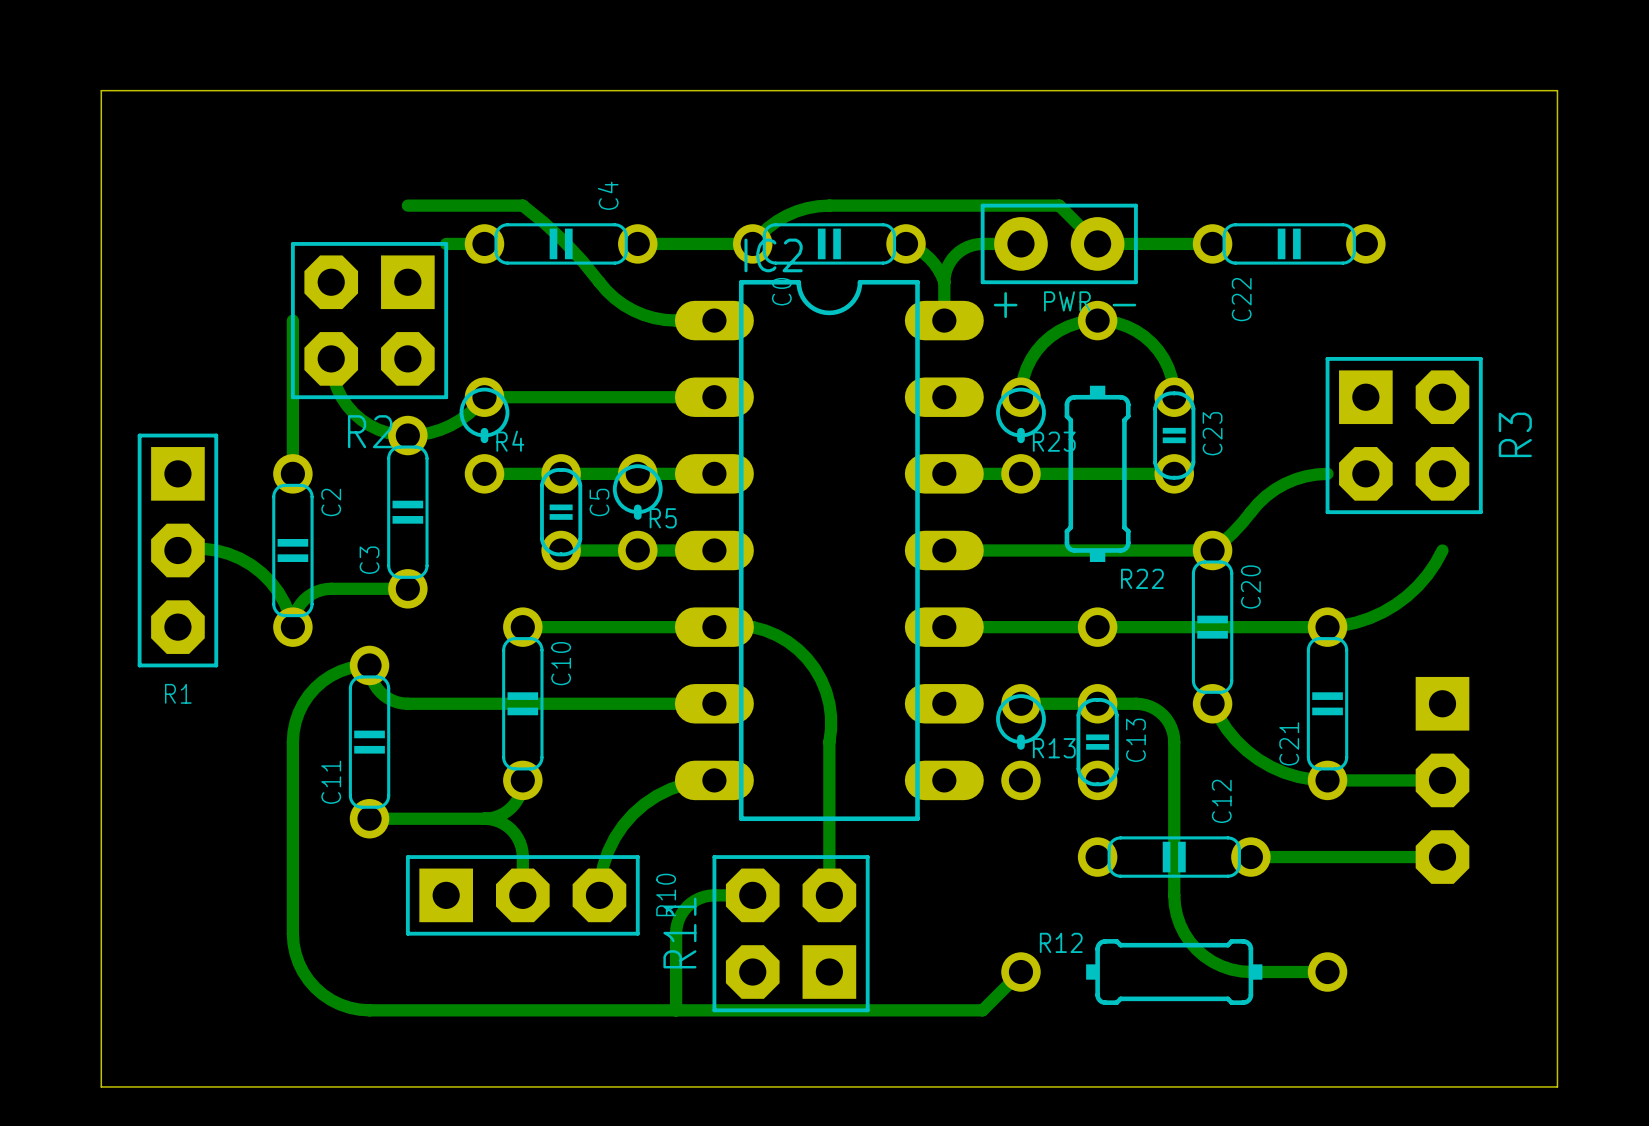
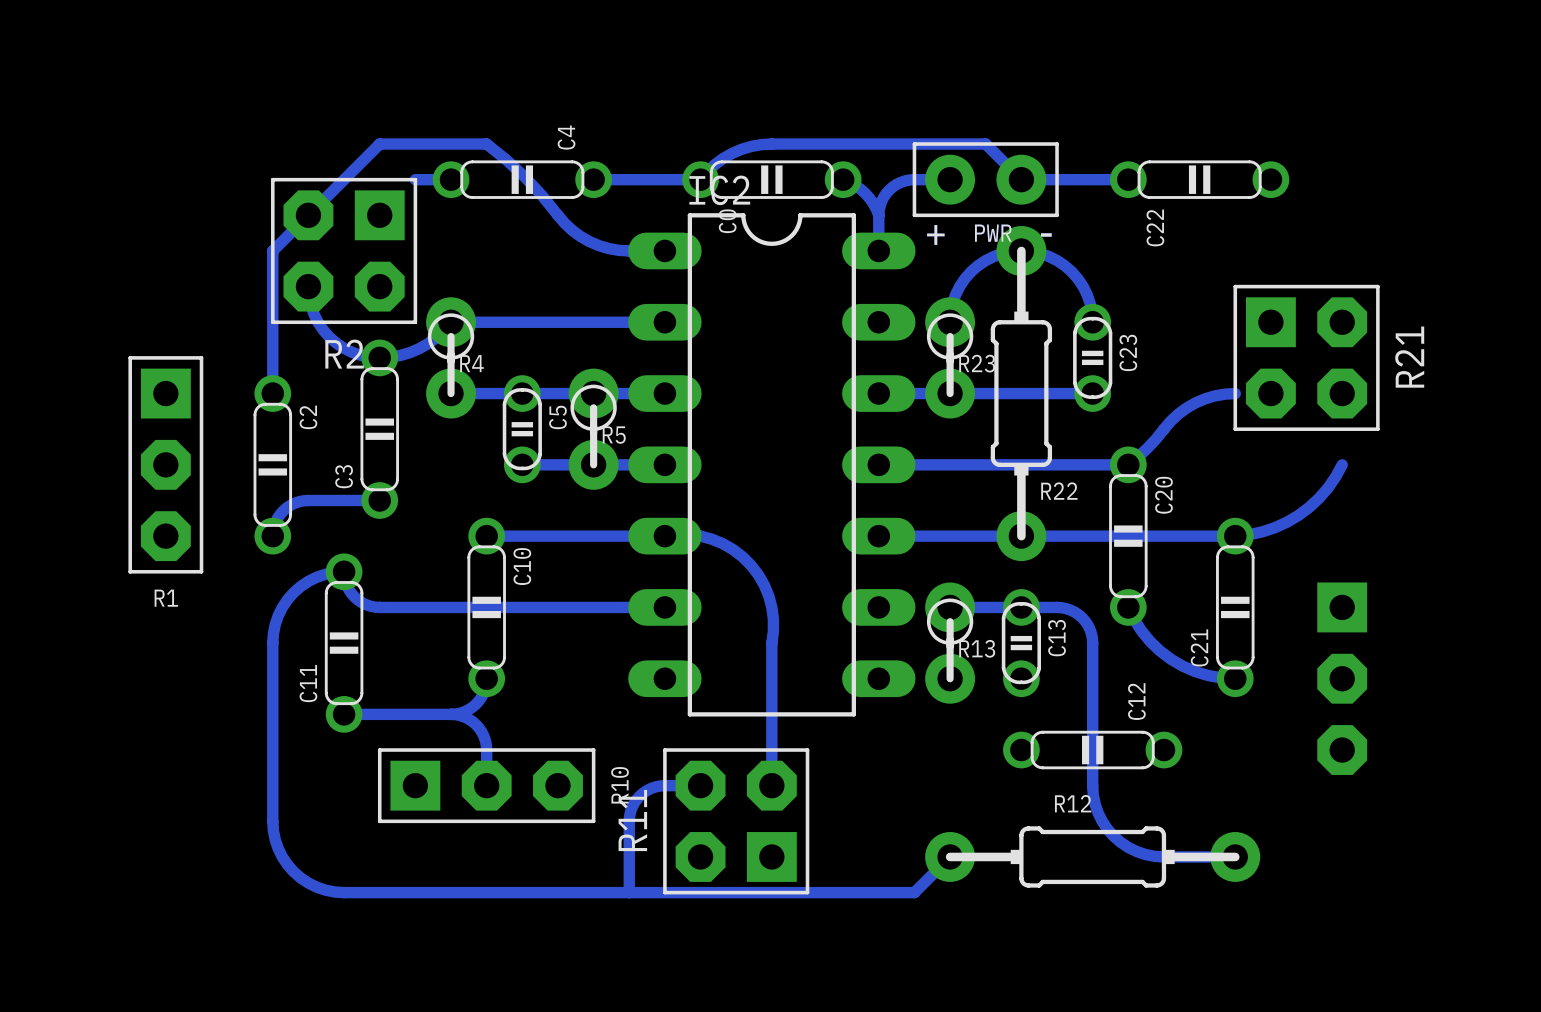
board edge: (101, 90) (1557, 90) (1557, 1086) (101, 1086) (101, 90) -> none
bottom track: none -> (379, 144) (272, 250)
R22 footprint: [1064, 300, 1131, 647] -> [990, 226, 1053, 562]
R4 footprint: [459, 377, 510, 494] -> [426, 297, 476, 419]
R23 footprint: [996, 377, 1046, 494] -> [925, 297, 976, 419]
R3 name: R3 (1515, 434) -> R21 (1409, 357)
R5 footprint: [612, 454, 663, 571] -> [568, 368, 619, 490]
bottom track: (177, 550) (203, 548) (216, 550) (228, 553) (251, 565) (261, 572) (278, 591) (289, 614) (292, 627) -> none
R13 footprint: [996, 684, 1046, 801] -> [925, 582, 976, 704]
bottom track: (714, 780) (684, 784) (670, 789) (644, 804) (633, 814) (614, 837) (608, 851) (603, 865) (599, 895) -> none
bottom track: (1327, 780) (1442, 780) -> none
bottom track: (1250, 857) (1442, 857) -> none
R12 footprint: [1001, 939, 1348, 1005] -> [925, 826, 1261, 888]
R12 name position: R12 (1061, 942) -> R12 (1073, 803)

